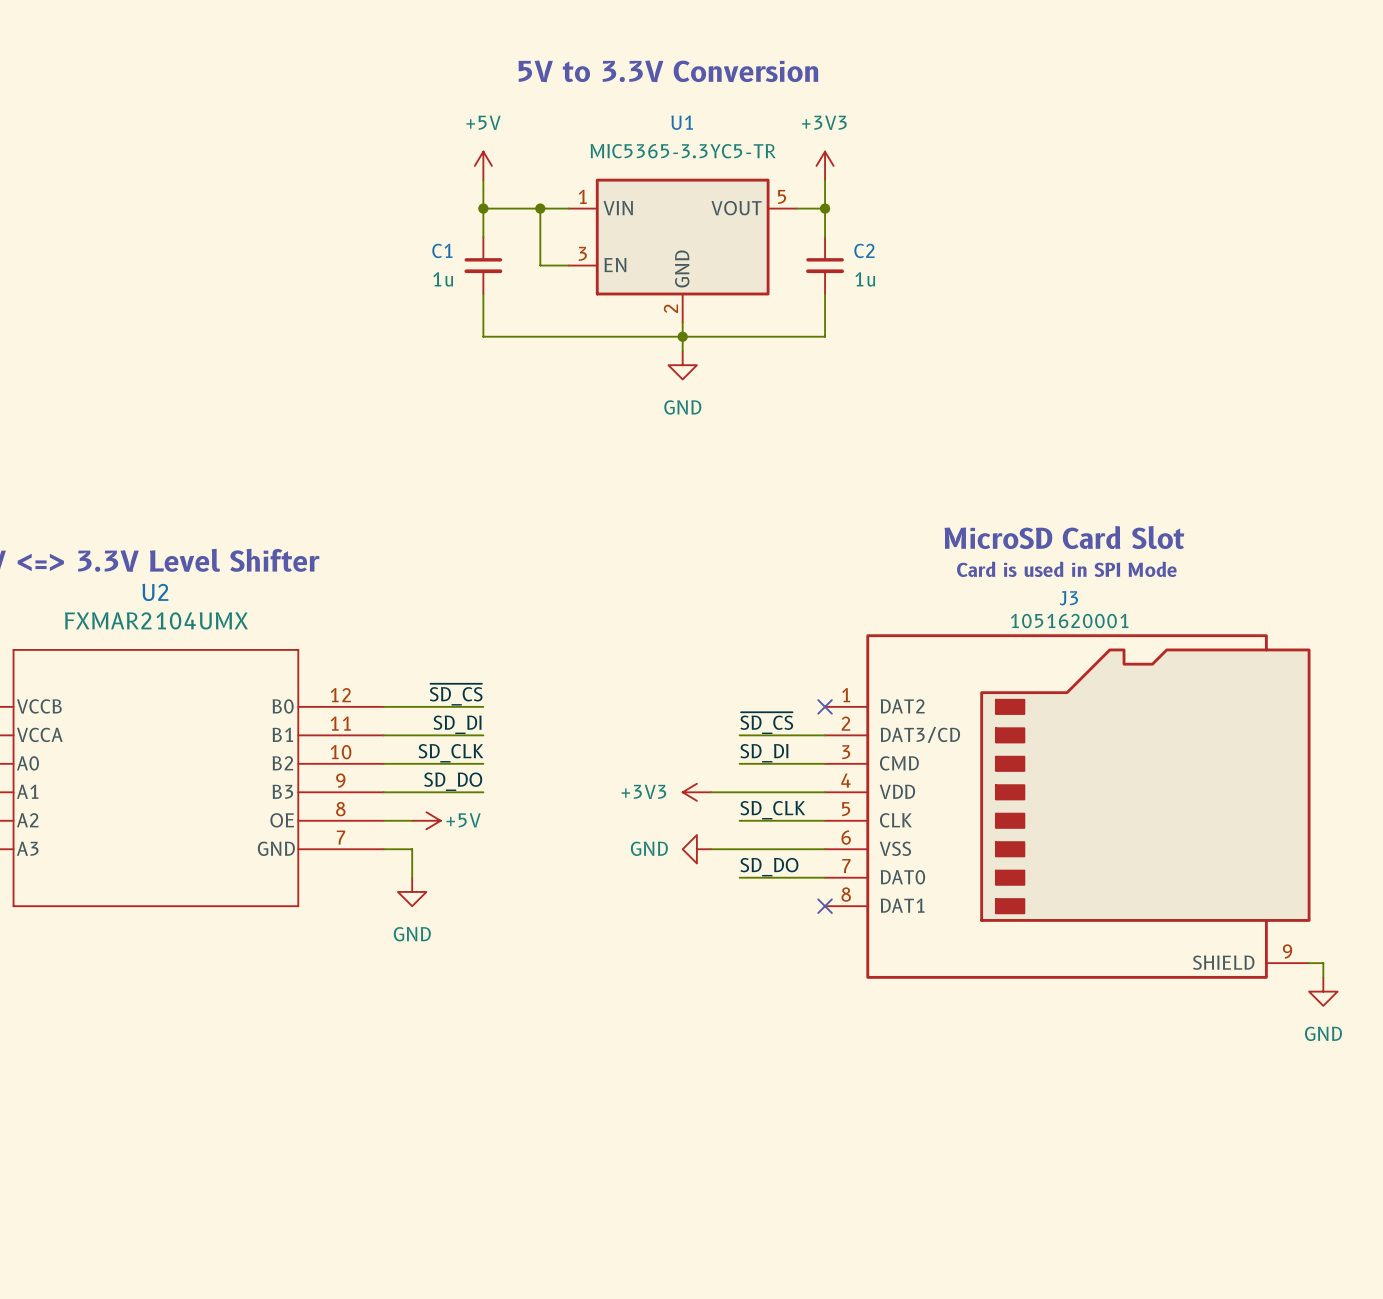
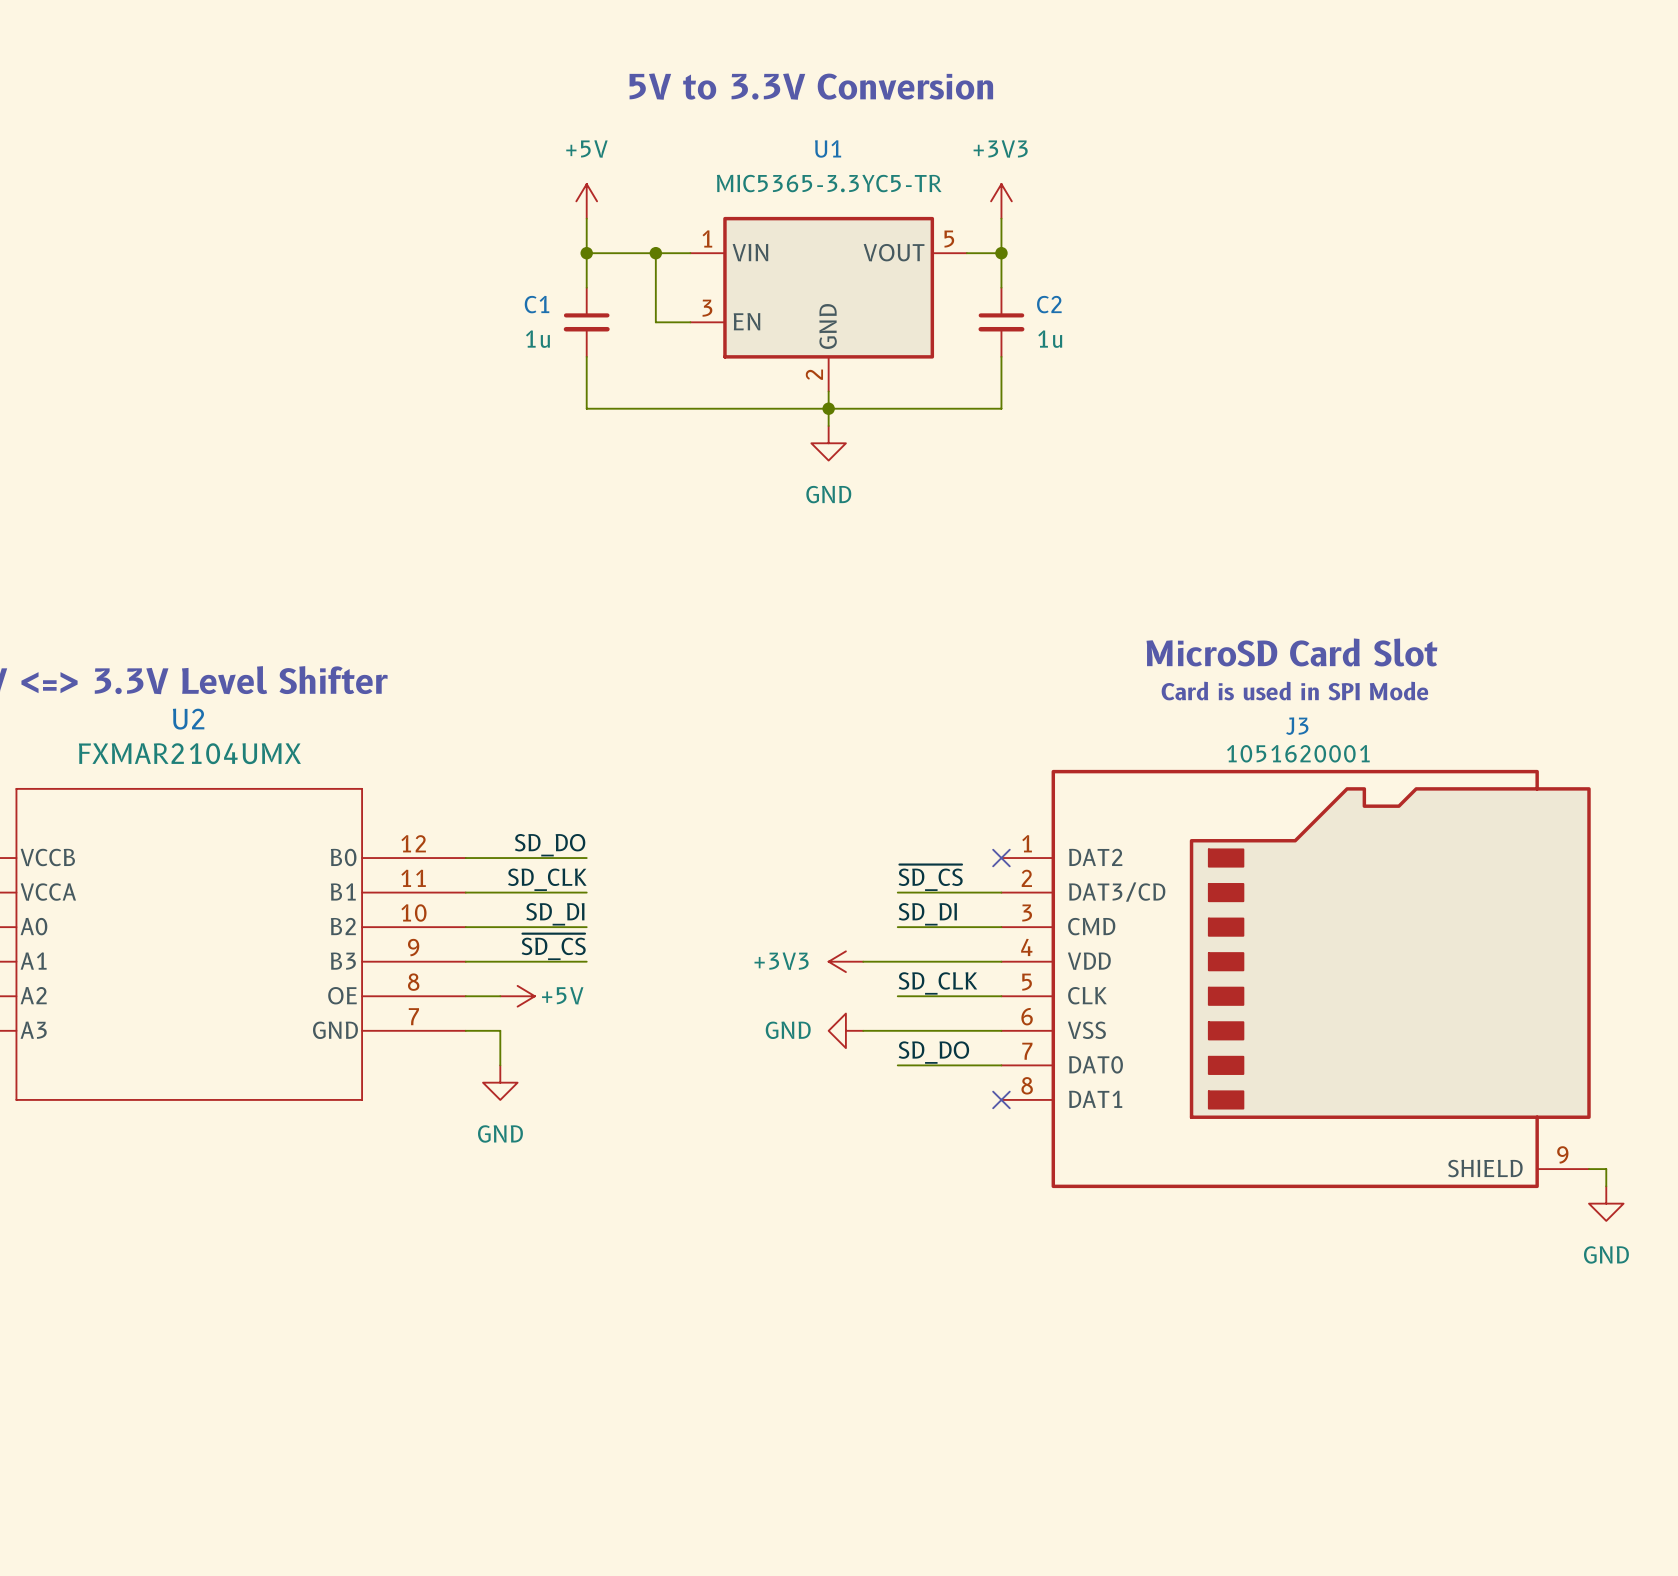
label: ~{SD_CS} (456, 694) -> SD_DO (550, 845)
label: SD_DI (457, 724) -> SD_CLK (547, 879)
label: SD_CLK (450, 753) -> SD_DI (555, 914)
label: SD_DO (453, 781) -> ~{SD_CS} (553, 946)

